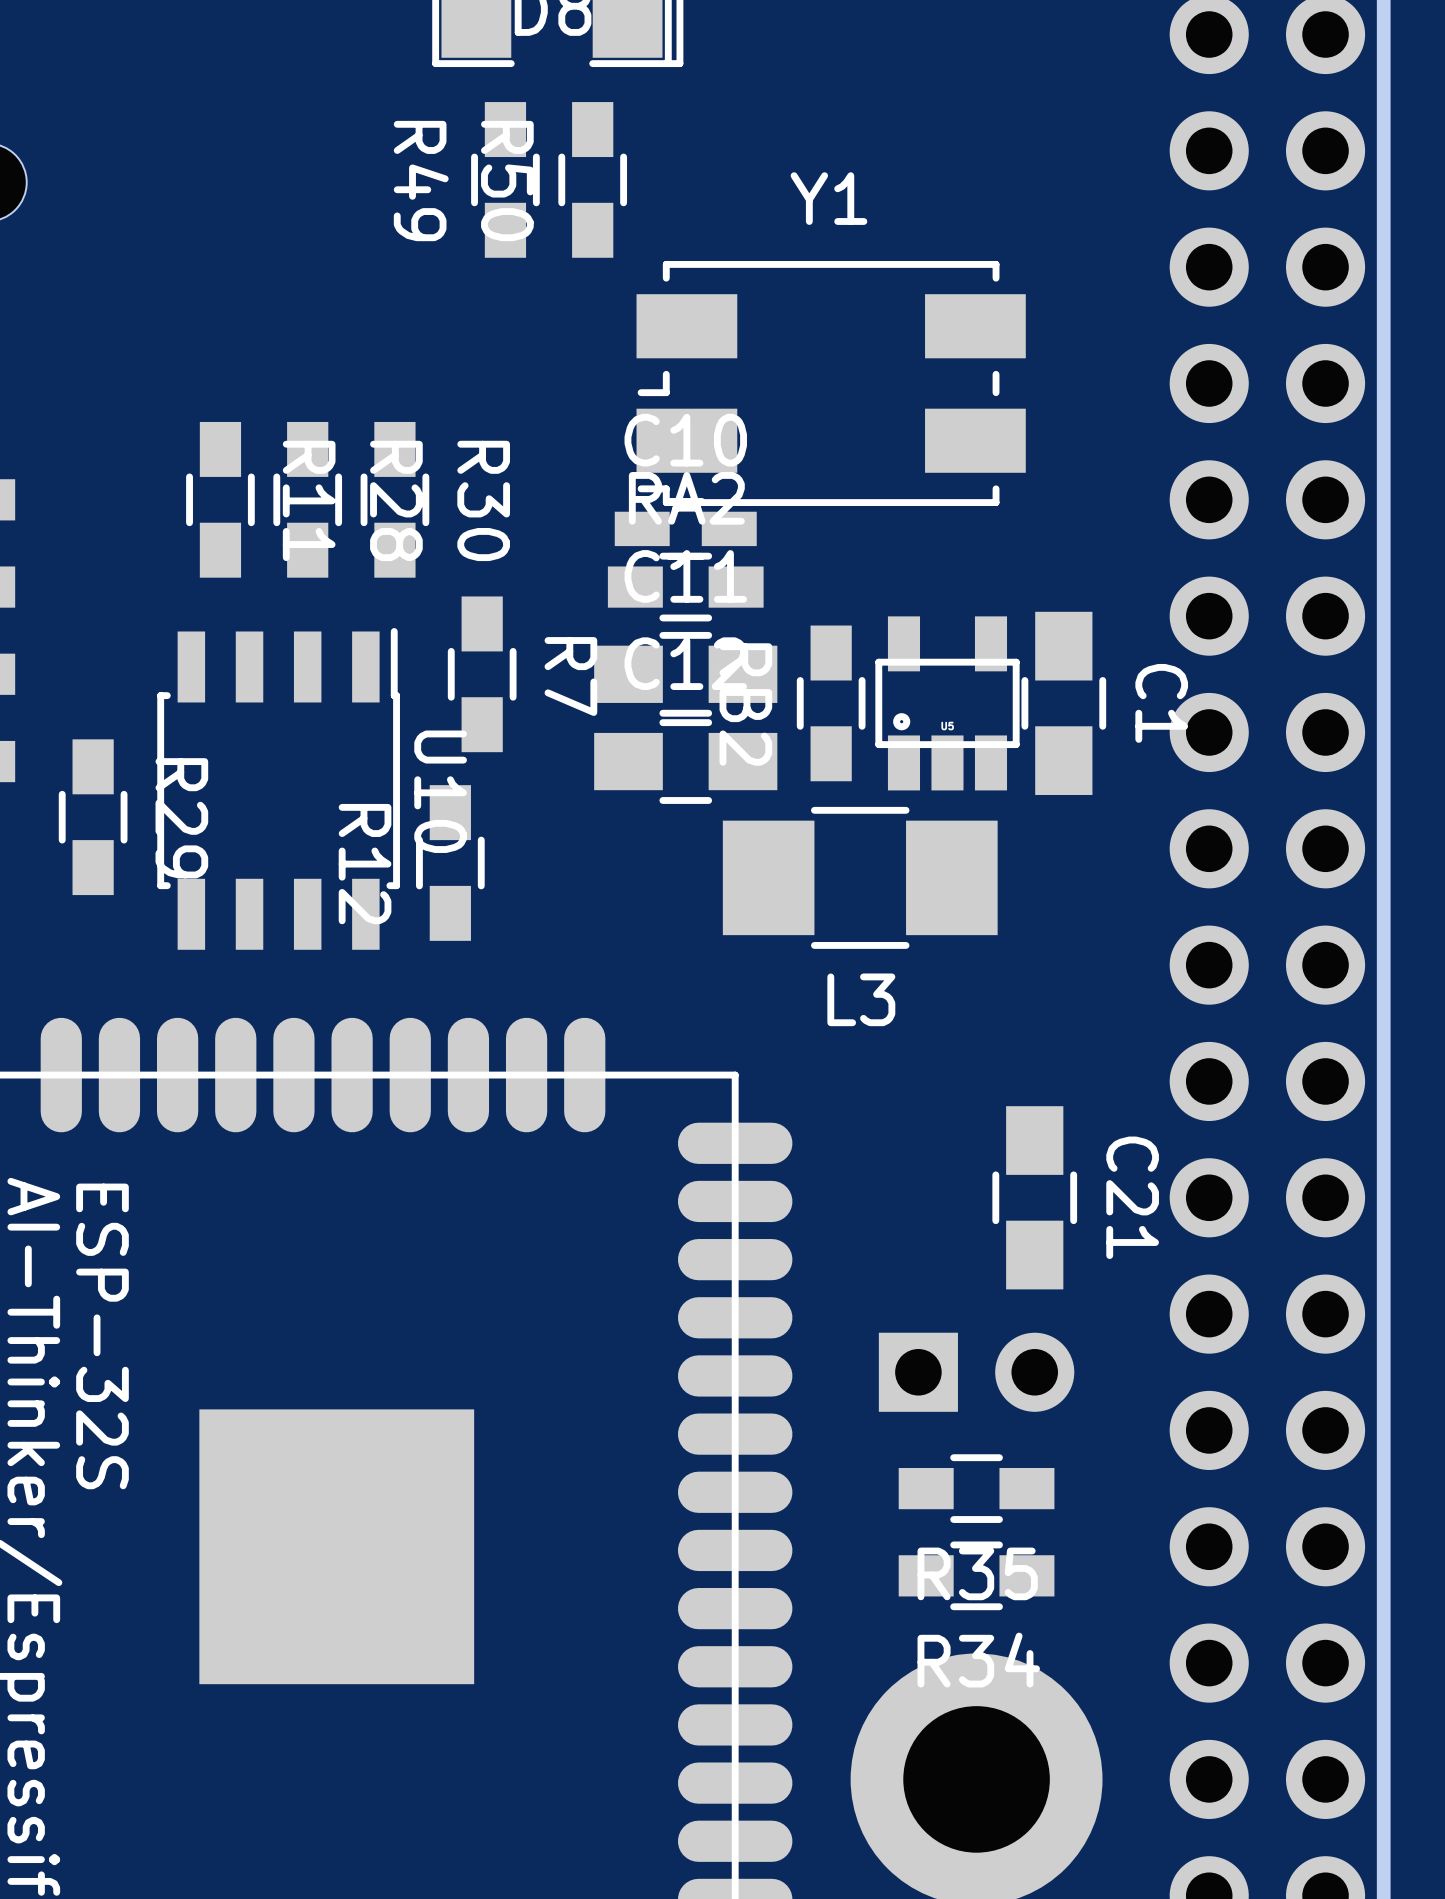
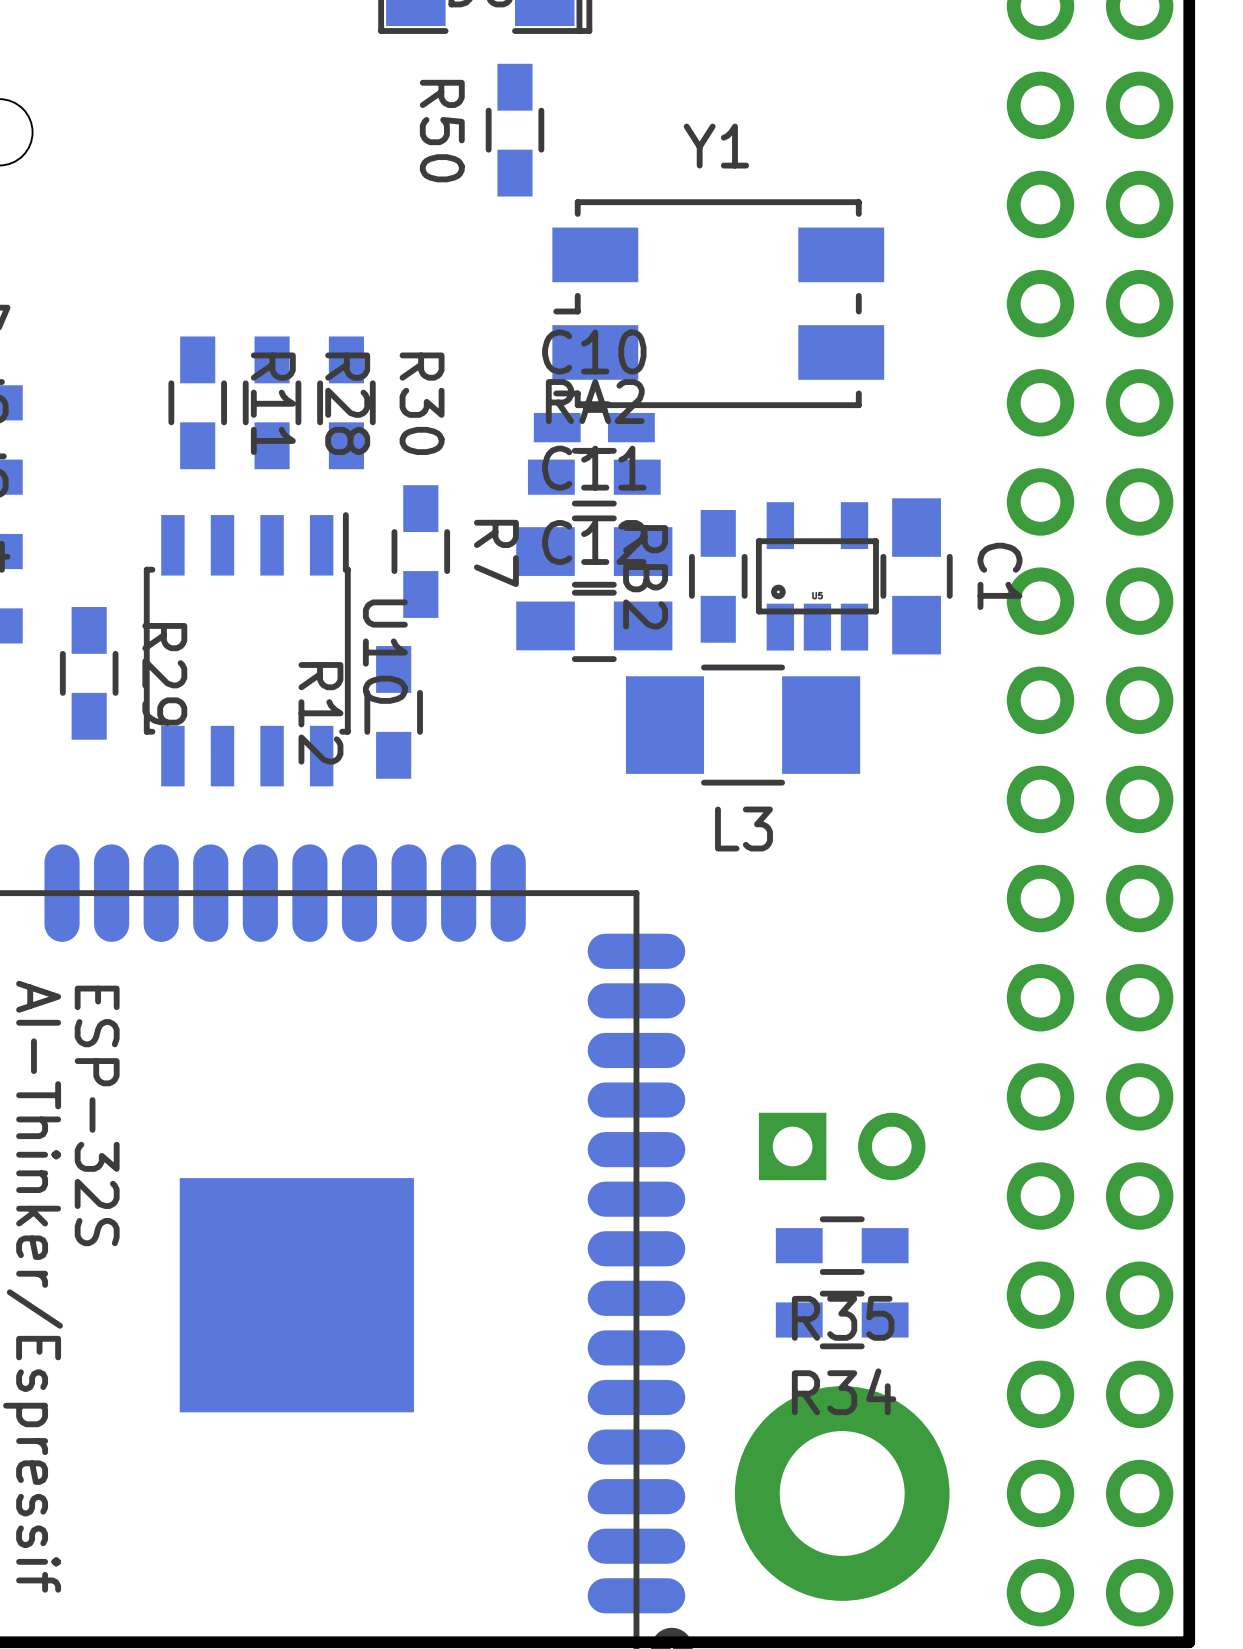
R49: (505, 179) -> none
C21: (1034, 1197) -> none

